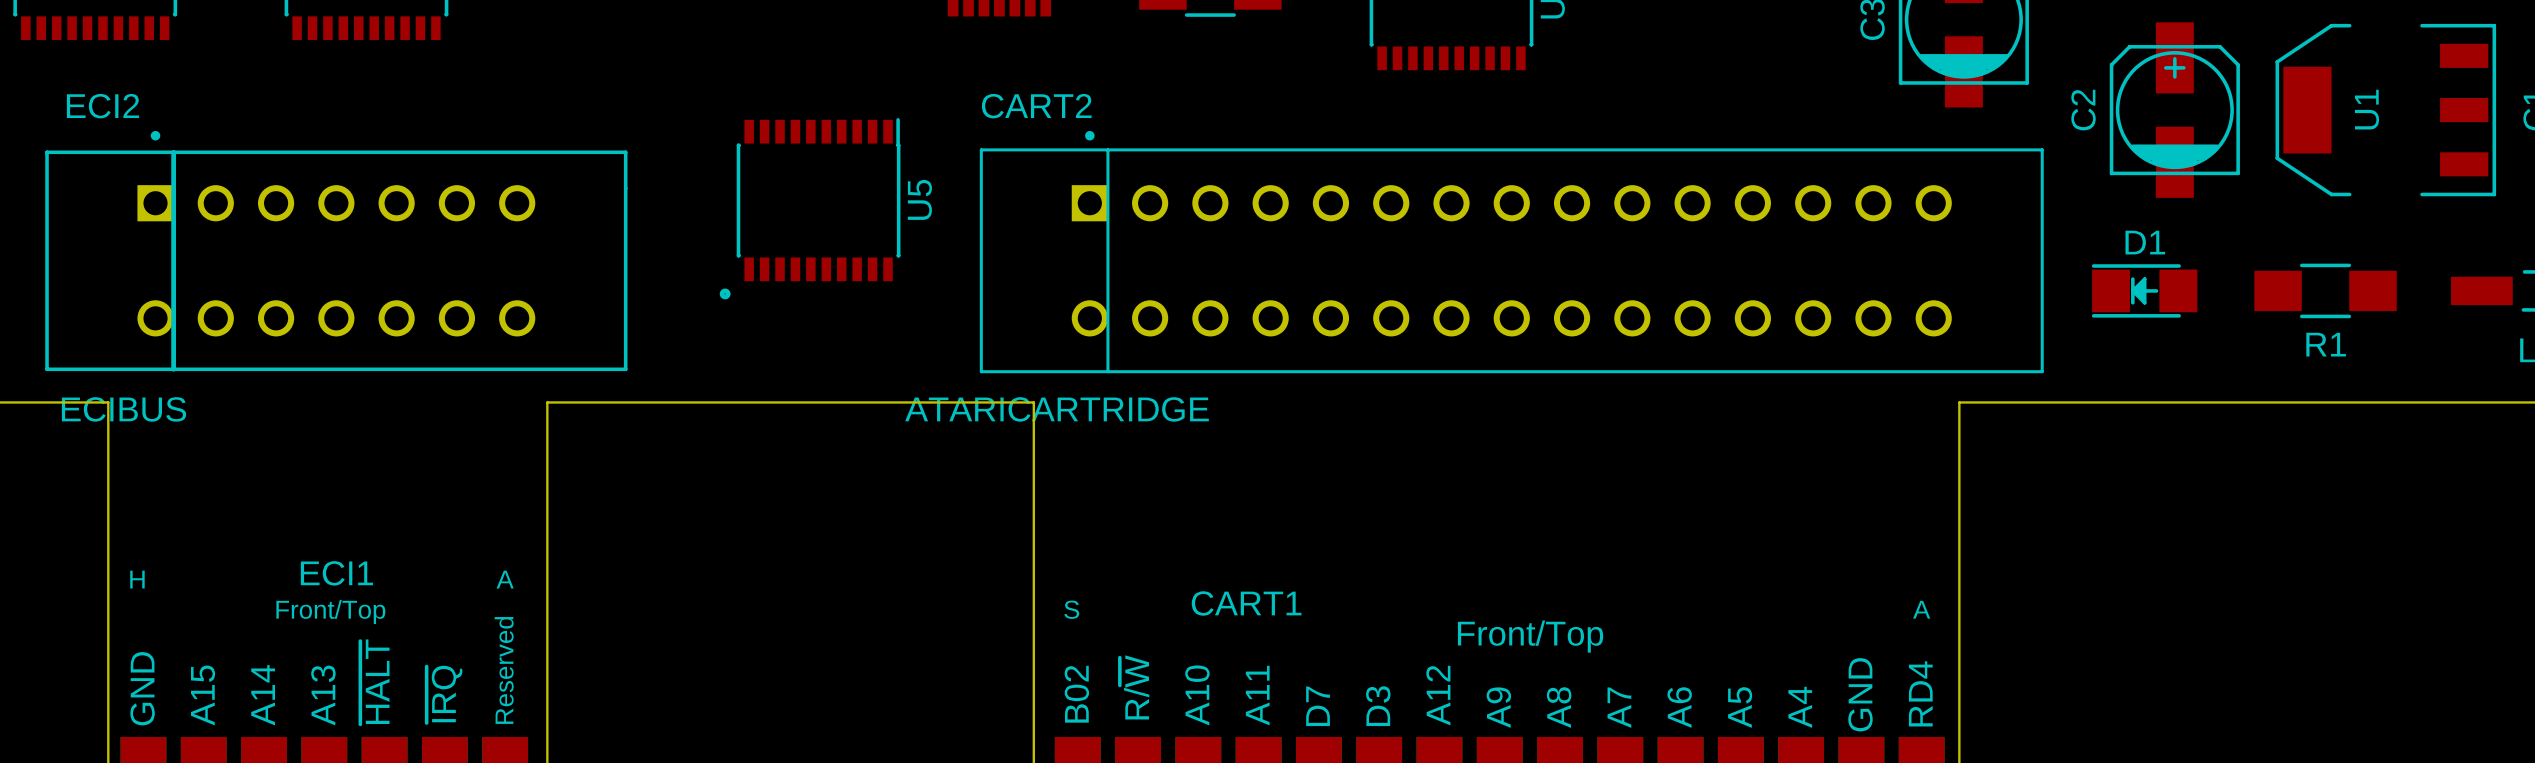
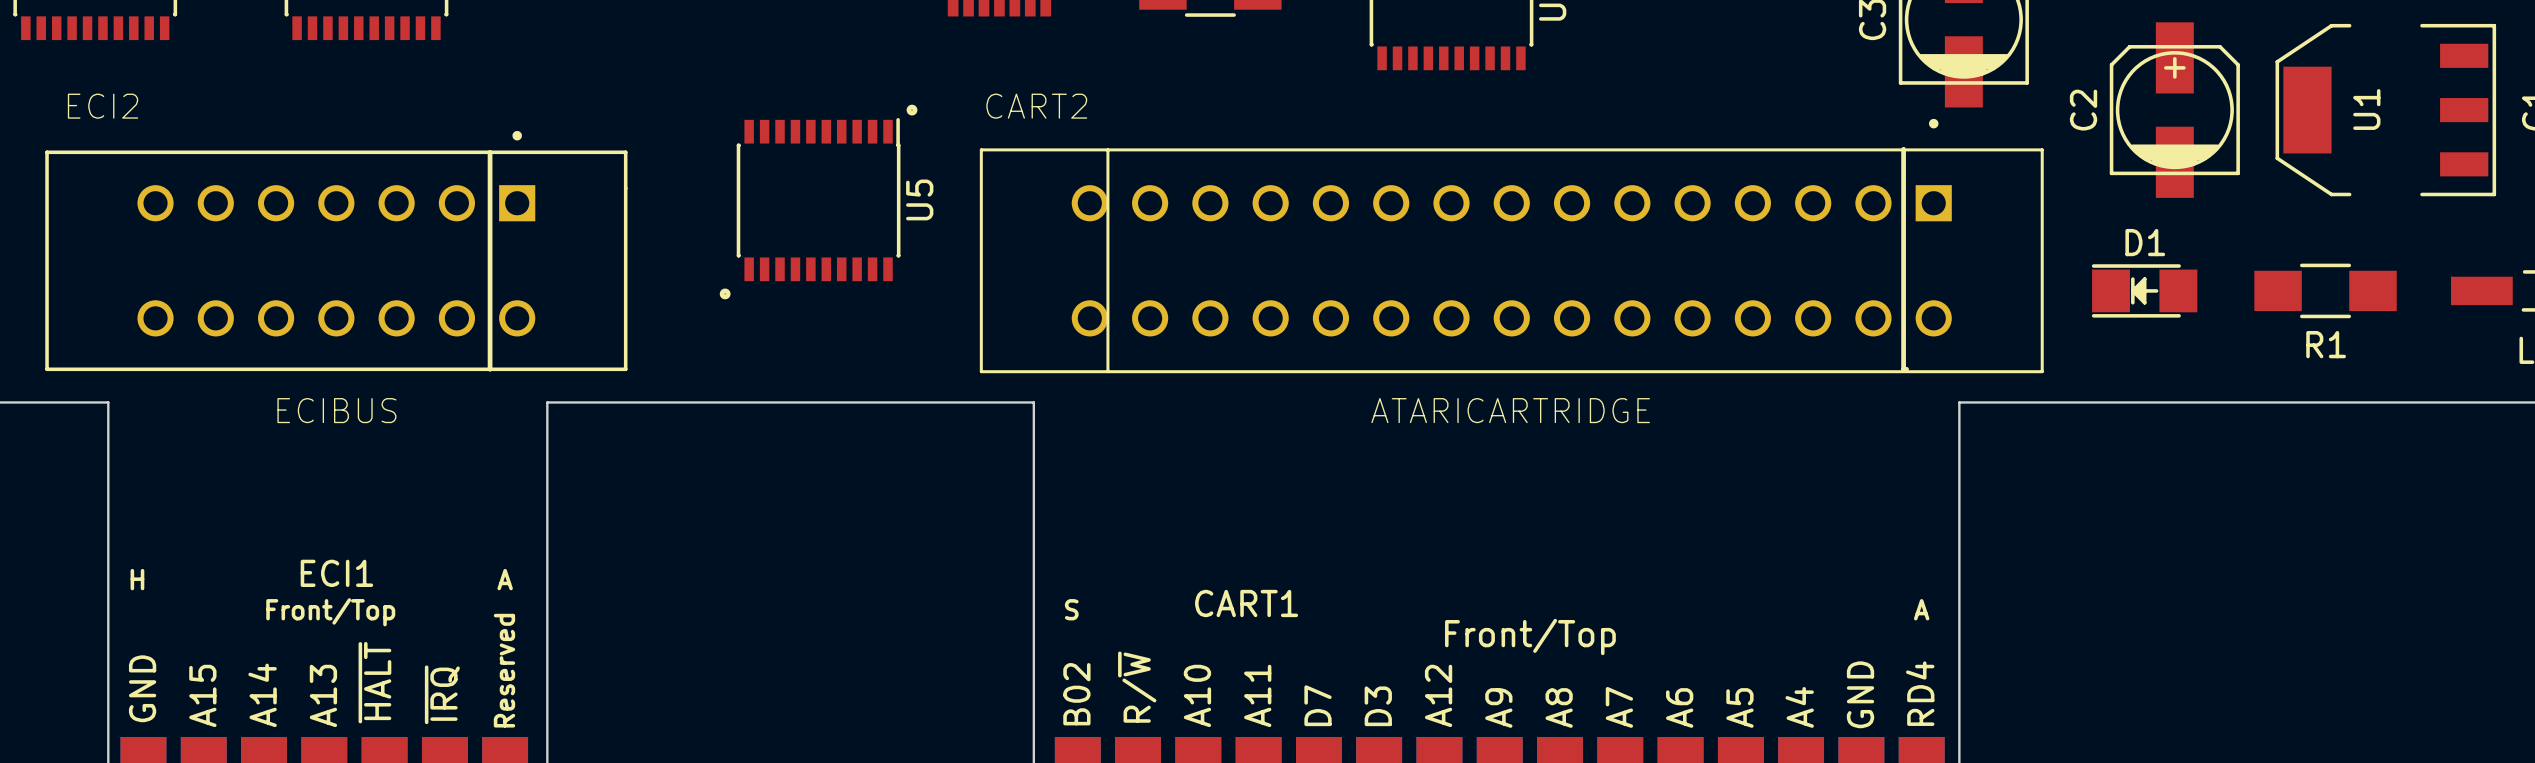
drawing: none -> [906, 104, 918, 116]
ECI2 footprint: [45, 130, 1110, 374] -> [45, 130, 1110, 374]
CART2 footprint: [979, 130, 2044, 374] -> [979, 118, 2044, 374]
line: none -> (1903, 149) (1903, 369) (1906, 369)
line: (173, 152) (173, 369) -> (490, 152) (490, 369)
ECI2 value position: ECIBUS (124, 409) -> ECIBUS (336, 410)
CART2 value position: ATARICARTRIDGE (1056, 409) -> ATARICARTRIDGE (1510, 410)

